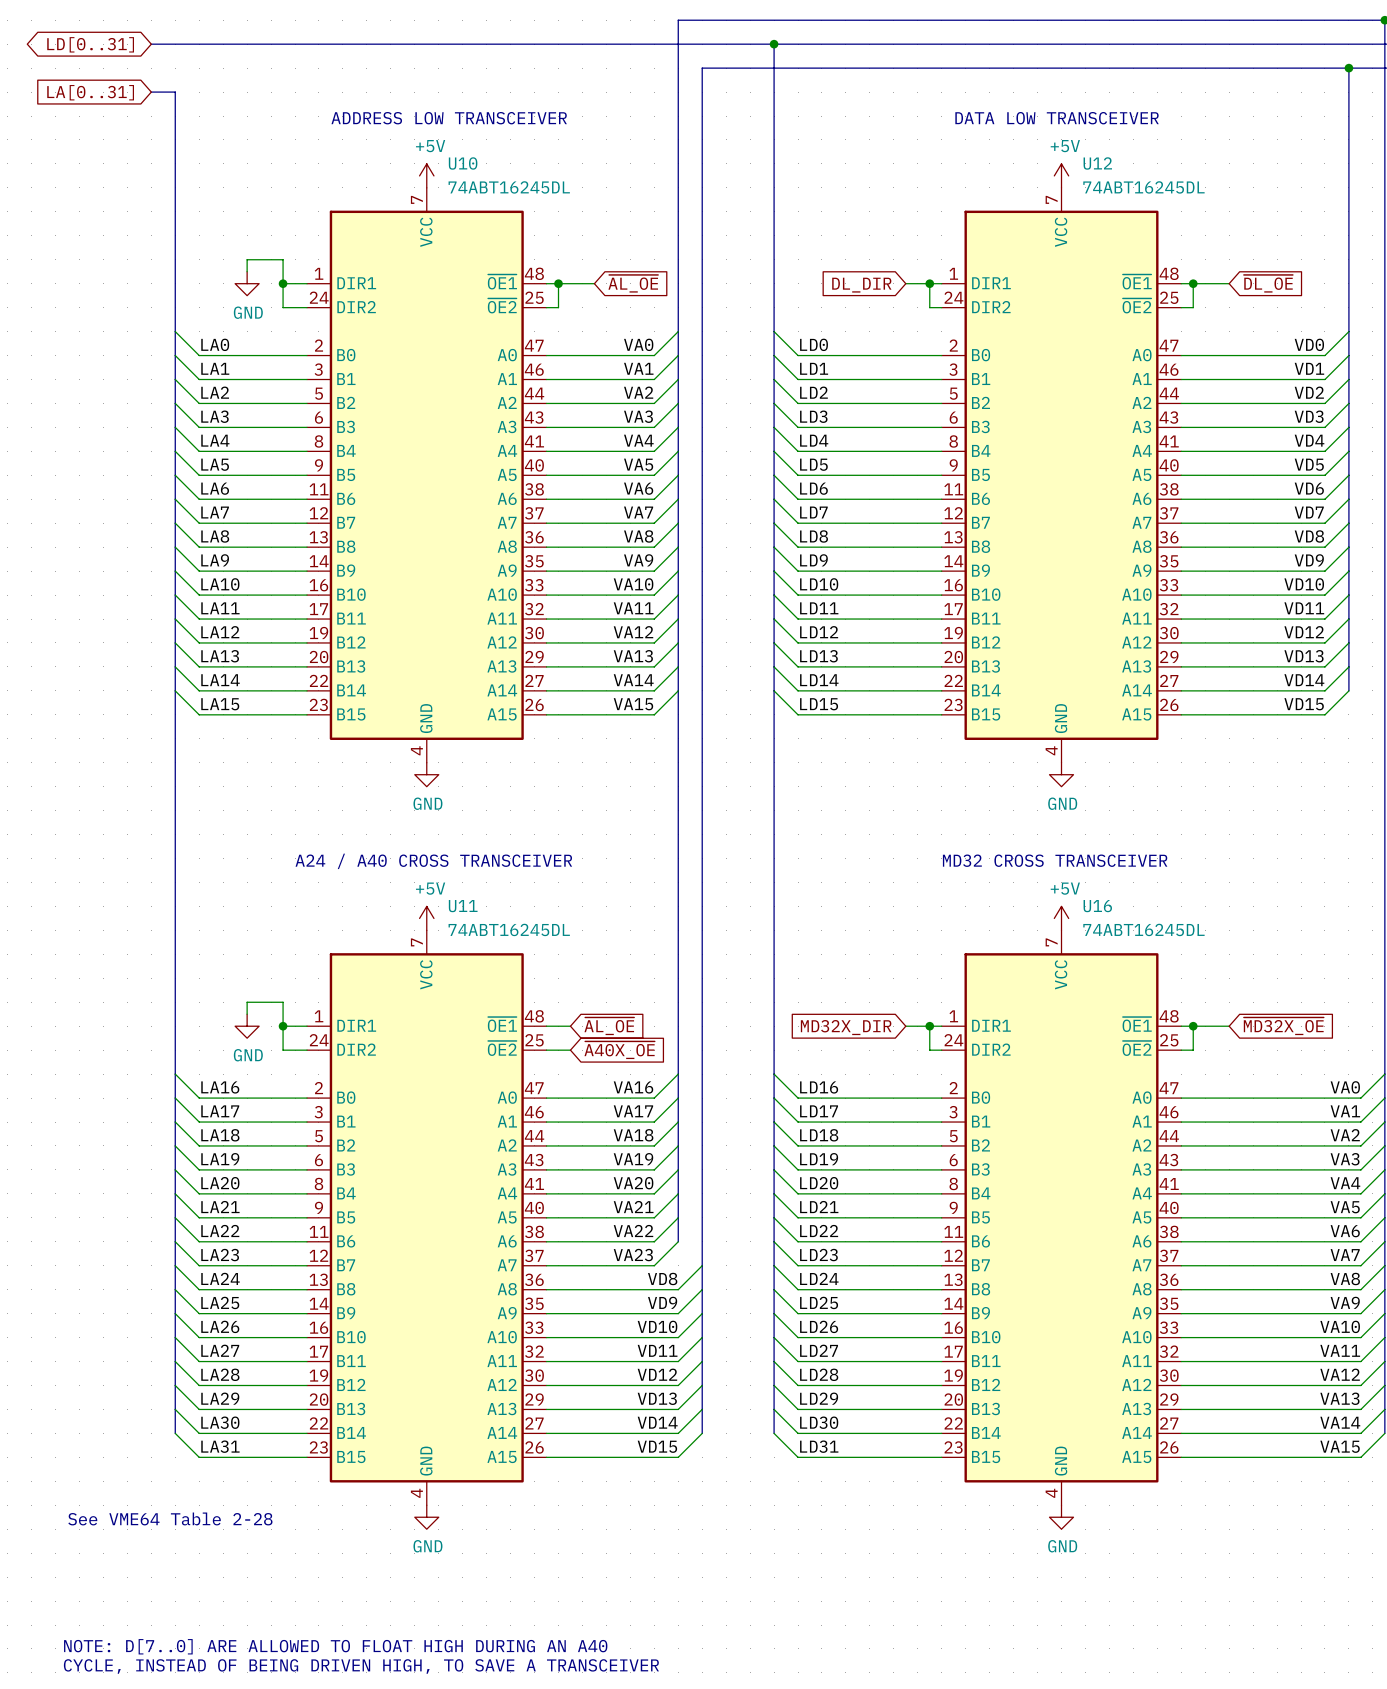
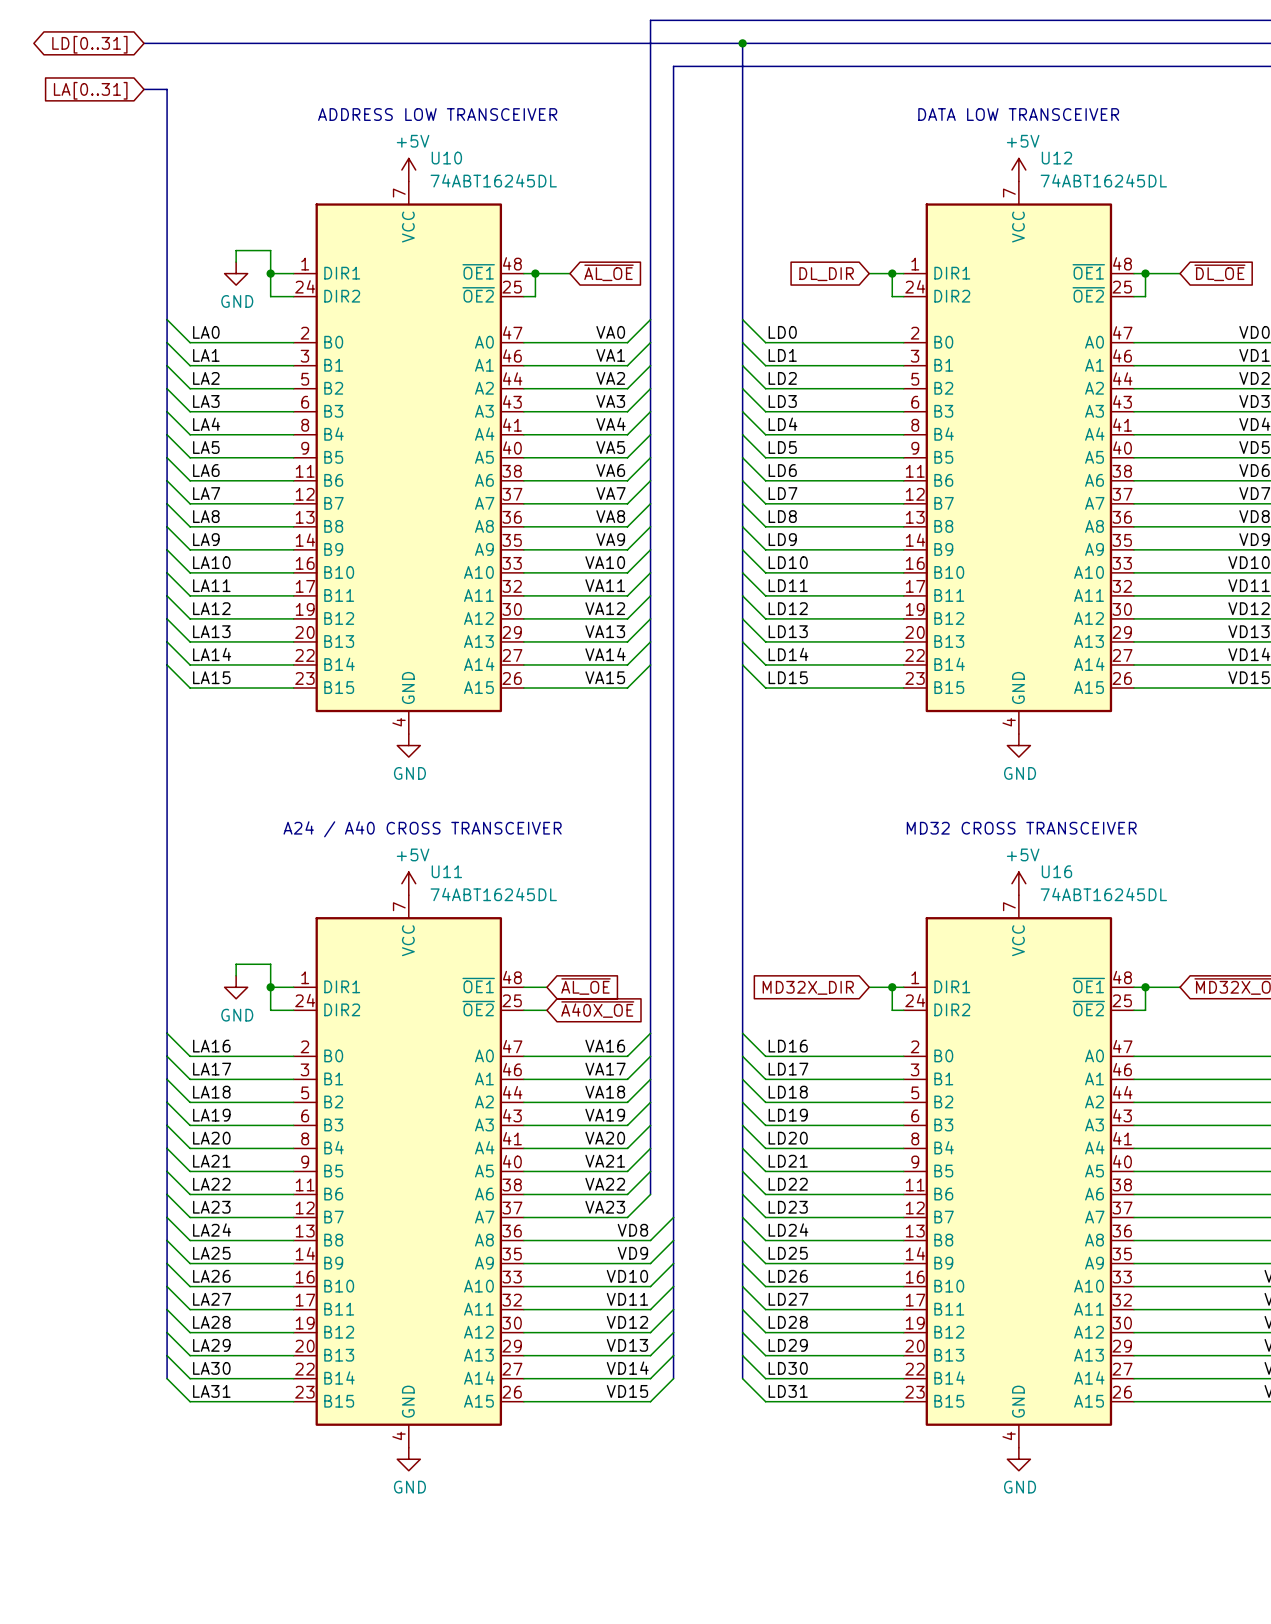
text: See VME64 Table 2-28 (170, 1518) -> none
text: NOTE: D[7..0] ARE ALLOWED TO FLOAT HIGH DURING AN A40 (335, 1646) -> none
text: CYCLE, INSTEAD OF BEING DRIVEN HIGH, TO SAVE A TRANSCEIVER (361, 1666) -> none

